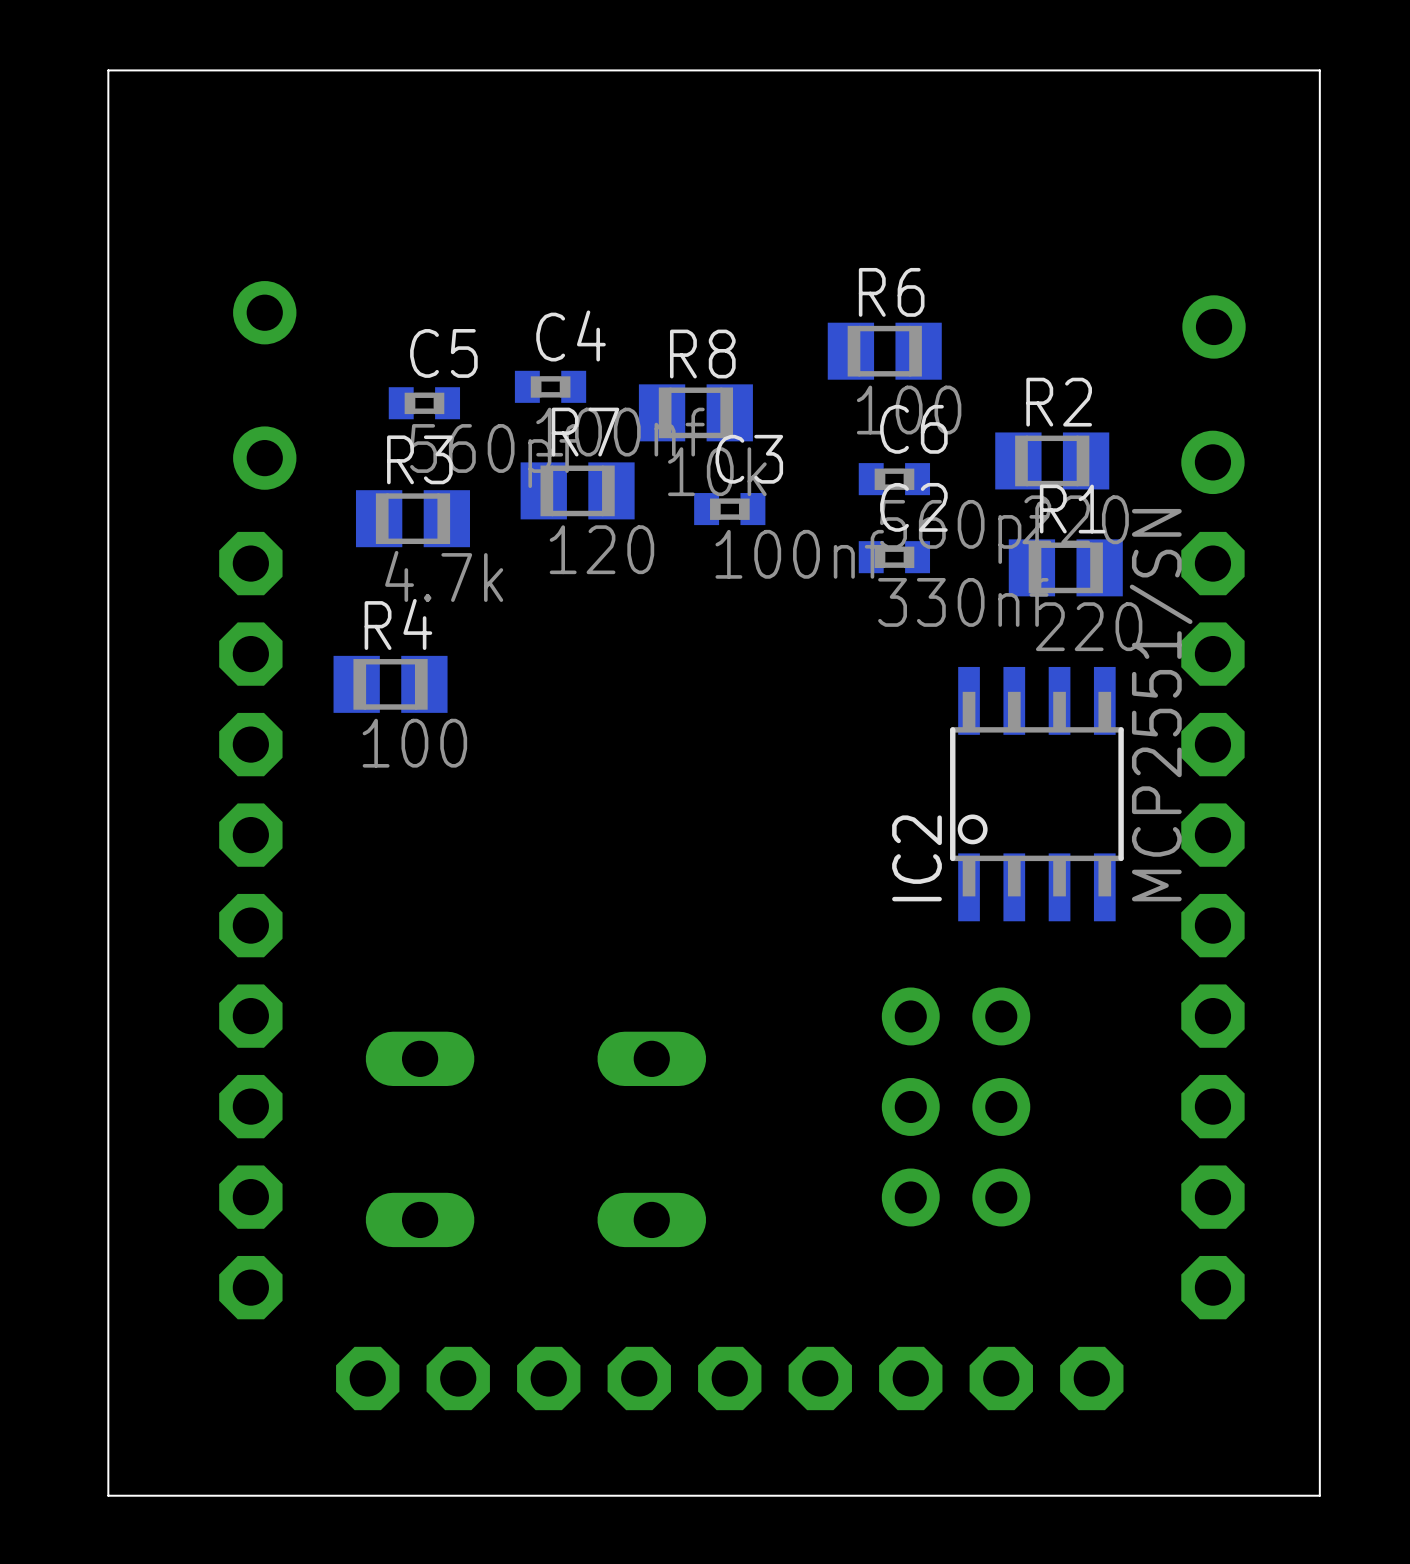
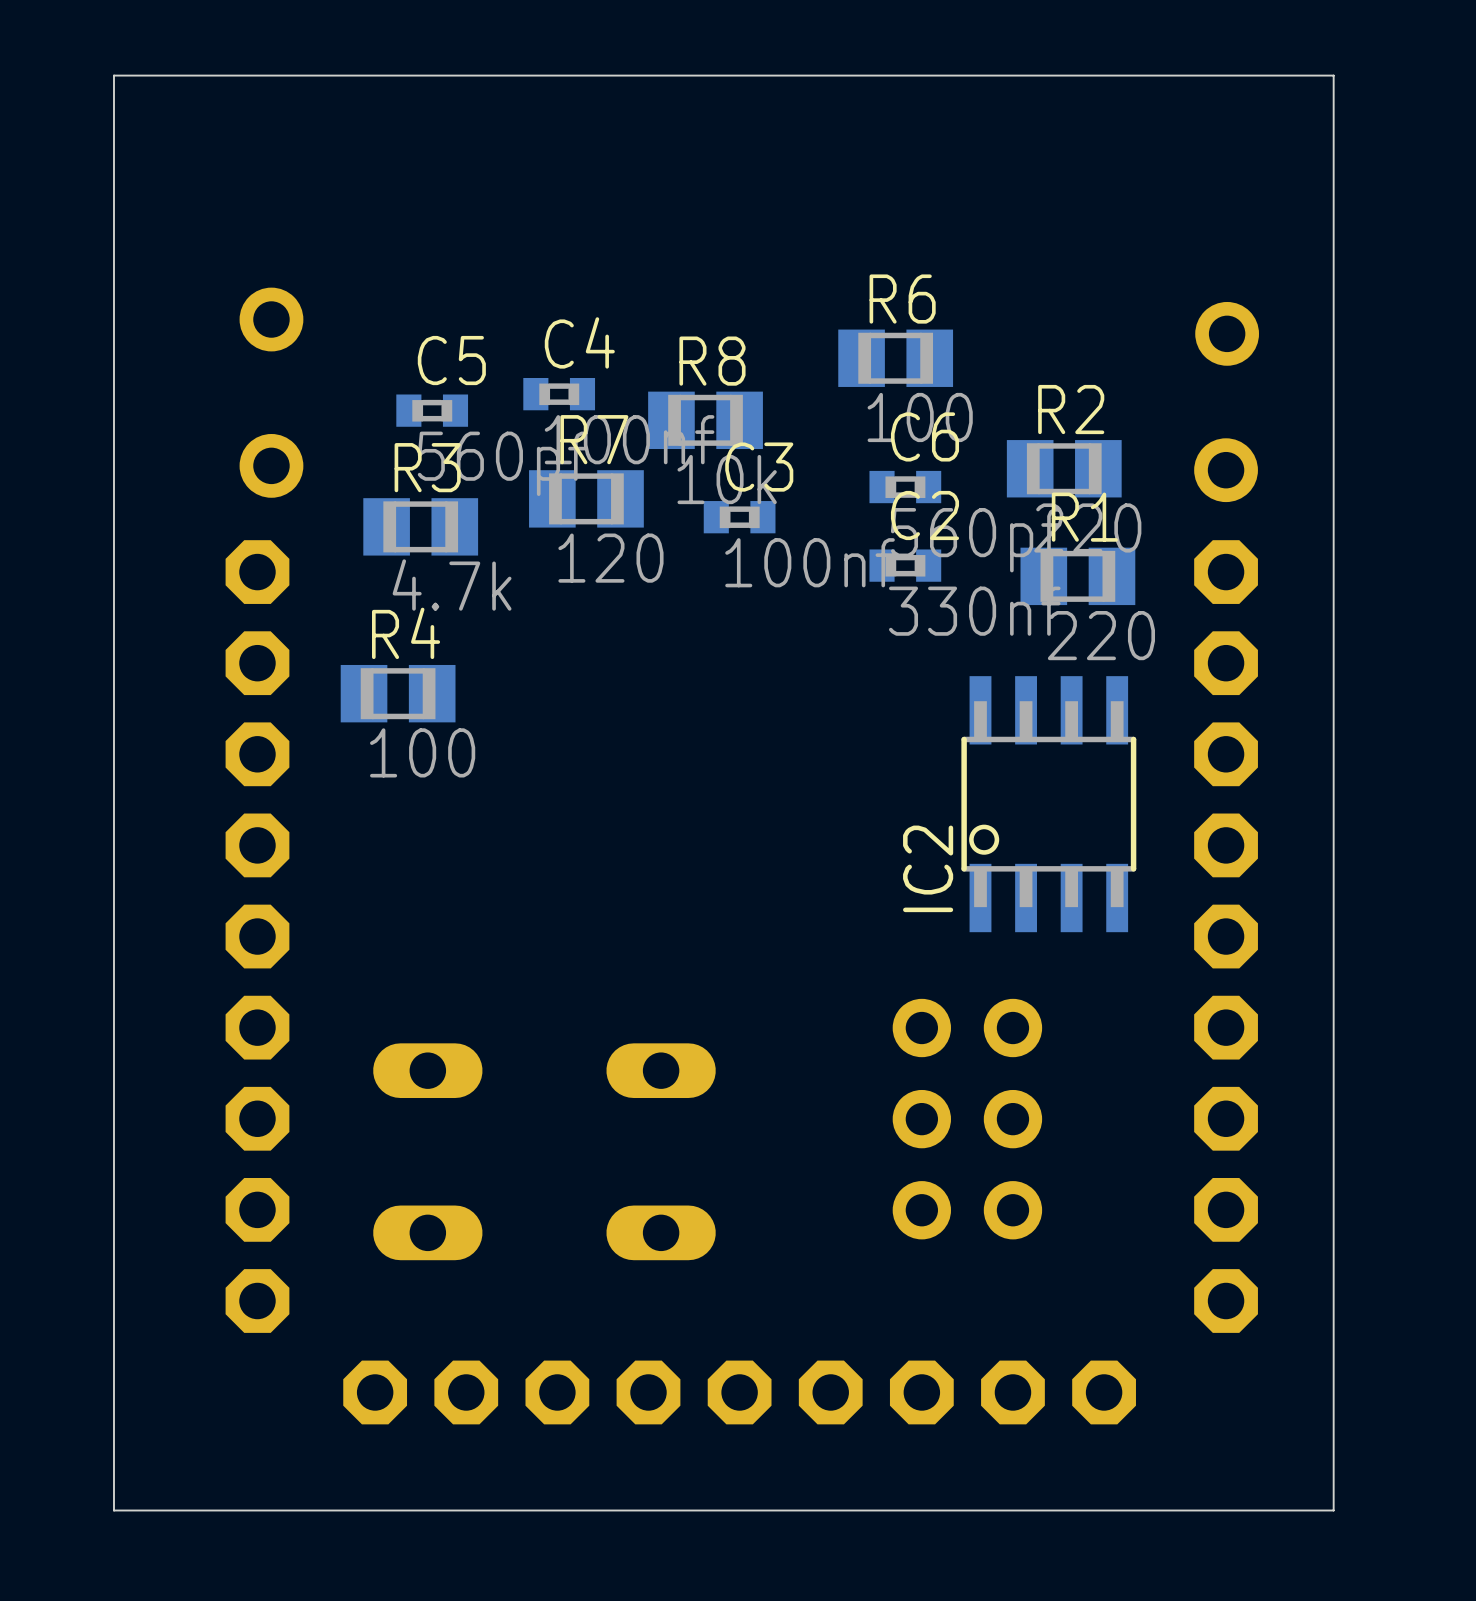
IC2 value: MCP2551/SN (1161, 705) -> none

